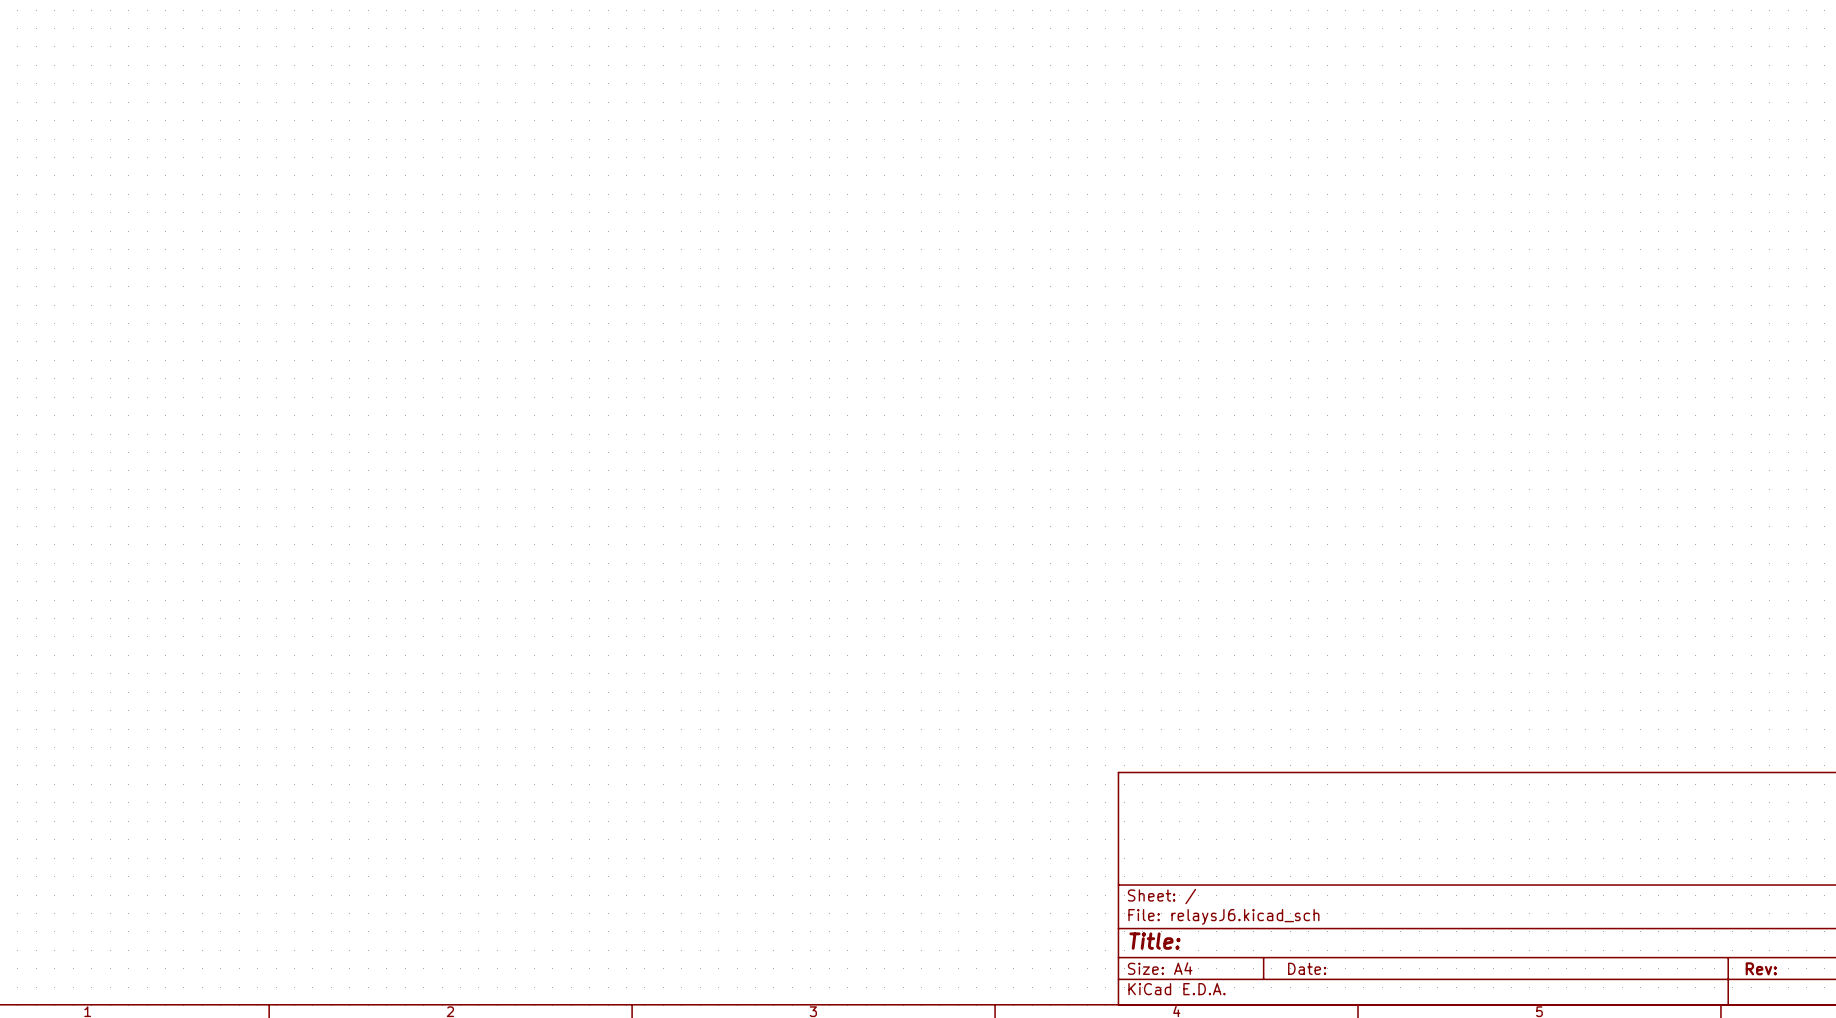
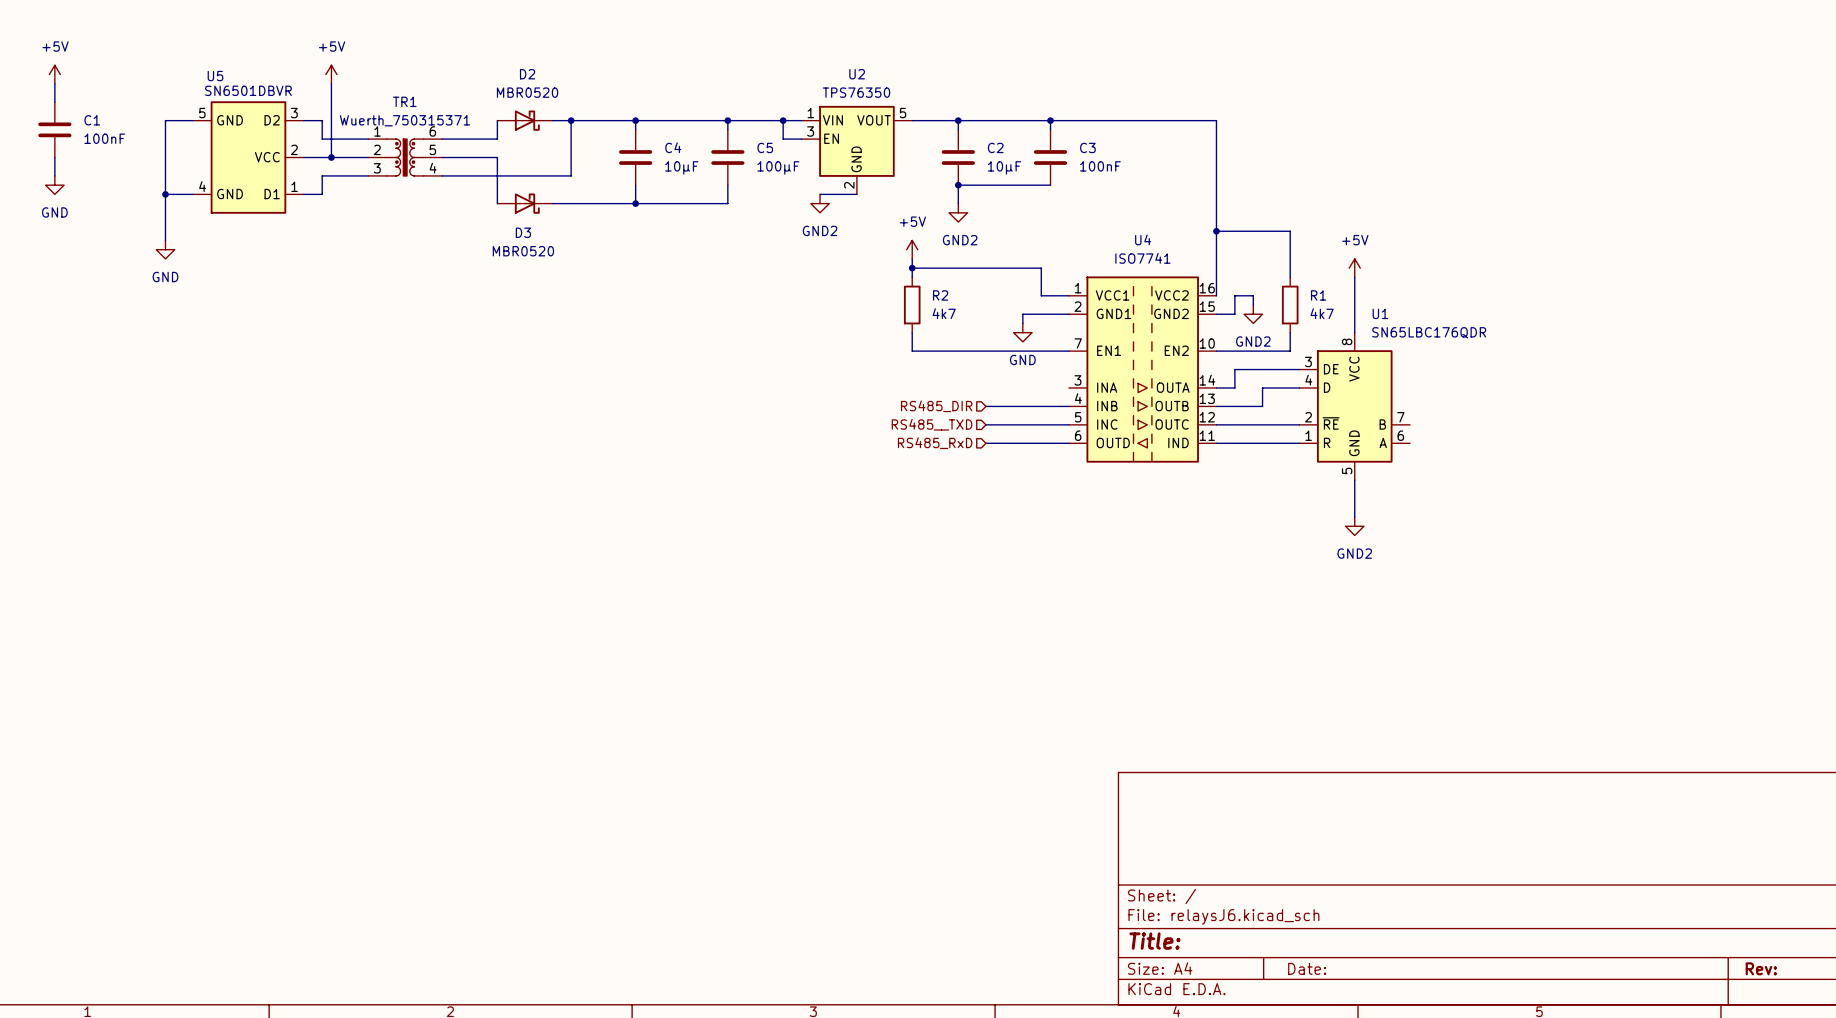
power symbol: none -> +5V (54, 74)
power symbol: none -> +5V (331, 74)
wire: none -> (54, 83) (54, 102)
wire: none -> (331, 83) (331, 157)
wire: none -> (193, 120) (165, 120) (165, 240)
wire: none -> (303, 120) (322, 120) (322, 139) (368, 139)
wire: none -> (497, 120) (497, 139) (442, 139)
D2: none -> MBR0520 (525, 120)
wire: none -> (552, 120) (801, 120)
wire: none -> (571, 120) (571, 175) (442, 175)
junction: none -> (571, 120)
wire: none -> (635, 120) (635, 129)
junction: none -> (635, 120)
wire: none -> (727, 120) (727, 129)
junction: none -> (727, 120)
wire: none -> (783, 120) (783, 139) (801, 139)
junction: none -> (783, 120)
wire: none -> (912, 120) (1216, 120) (1216, 295)
wire: none -> (958, 120) (958, 129)
junction: none -> (958, 120)
wire: none -> (1050, 120) (1050, 129)
junction: none -> (1050, 120)
C1: none -> 100nF (54, 129)
U2: none -> TPS76350 (856, 150)
wire: none -> (54, 157) (54, 175)
U5: none -> SN6501DBVR (248, 157)
wire: none -> (303, 157) (368, 157)
junction: none -> (331, 157)
TR1: none -> Wuerth_750315371 (405, 157)
wire: none -> (442, 157) (497, 157) (497, 203)
C4: none -> 10µF (635, 157)
C5: none -> 100µF (727, 157)
C2: none -> 10µF (958, 157)
C3: none -> 100nF (1050, 157)
wire: none -> (368, 175) (322, 175) (322, 194) (303, 194)
power symbol: none -> GND (54, 185)
wire: none -> (635, 185) (635, 203)
wire: none -> (727, 185) (727, 203) (552, 203)
junction: none -> (958, 185)
wire: none -> (1050, 185) (958, 185) (958, 203)
wire: none -> (165, 194) (193, 194)
junction: none -> (165, 194)
wire: none -> (820, 194) (856, 194)
D3: none -> MBR0520 (525, 203)
junction: none -> (635, 203)
power symbol: none -> GND2 (820, 203)
power symbol: none -> GND2 (958, 212)
wire: none -> (1216, 231) (1290, 231) (1290, 277)
junction: none -> (1216, 231)
power symbol: none -> GND (165, 249)
power symbol: none -> +5V (912, 249)
wire: none -> (912, 258) (912, 277)
wire: none -> (912, 268) (1041, 268) (1041, 295) (1068, 295)
junction: none -> (912, 268)
power symbol: none -> +5V (1354, 268)
wire: none -> (1354, 277) (1354, 332)
R2: none -> 4k7 (912, 305)
wire: none -> (1253, 305) (1253, 295) (1234, 295) (1234, 314) (1216, 314)
R1: none -> 4k7 (1290, 305)
wire: none -> (1068, 314) (1022, 314) (1022, 323)
power symbol: none -> GND2 (1253, 314)
wire: none -> (912, 332) (912, 351) (1068, 351)
power symbol: none -> GND (1022, 332)
wire: none -> (1290, 332) (1290, 351) (1216, 351)
U4: none -> ISO7741 (1142, 369)
wire: none -> (1299, 369) (1234, 369) (1234, 387) (1216, 387)
wire: none -> (1299, 387) (1262, 387) (1262, 406) (1216, 406)
hierarchical label: none -> RS485_DIR (936, 406)
wire: none -> (985, 406) (1068, 406)
U1: none -> SN65LBC176QDR (1354, 406)
hierarchical label: none -> RS485__TXD (932, 424)
wire: none -> (985, 424) (1068, 424)
wire: none -> (1216, 424) (1299, 424)
hierarchical label: none -> RS485_RxD (935, 443)
wire: none -> (985, 443) (1068, 443)
wire: none -> (1216, 443) (1299, 443)
wire: none -> (1354, 480) (1354, 517)
power symbol: none -> GND2 (1354, 526)

